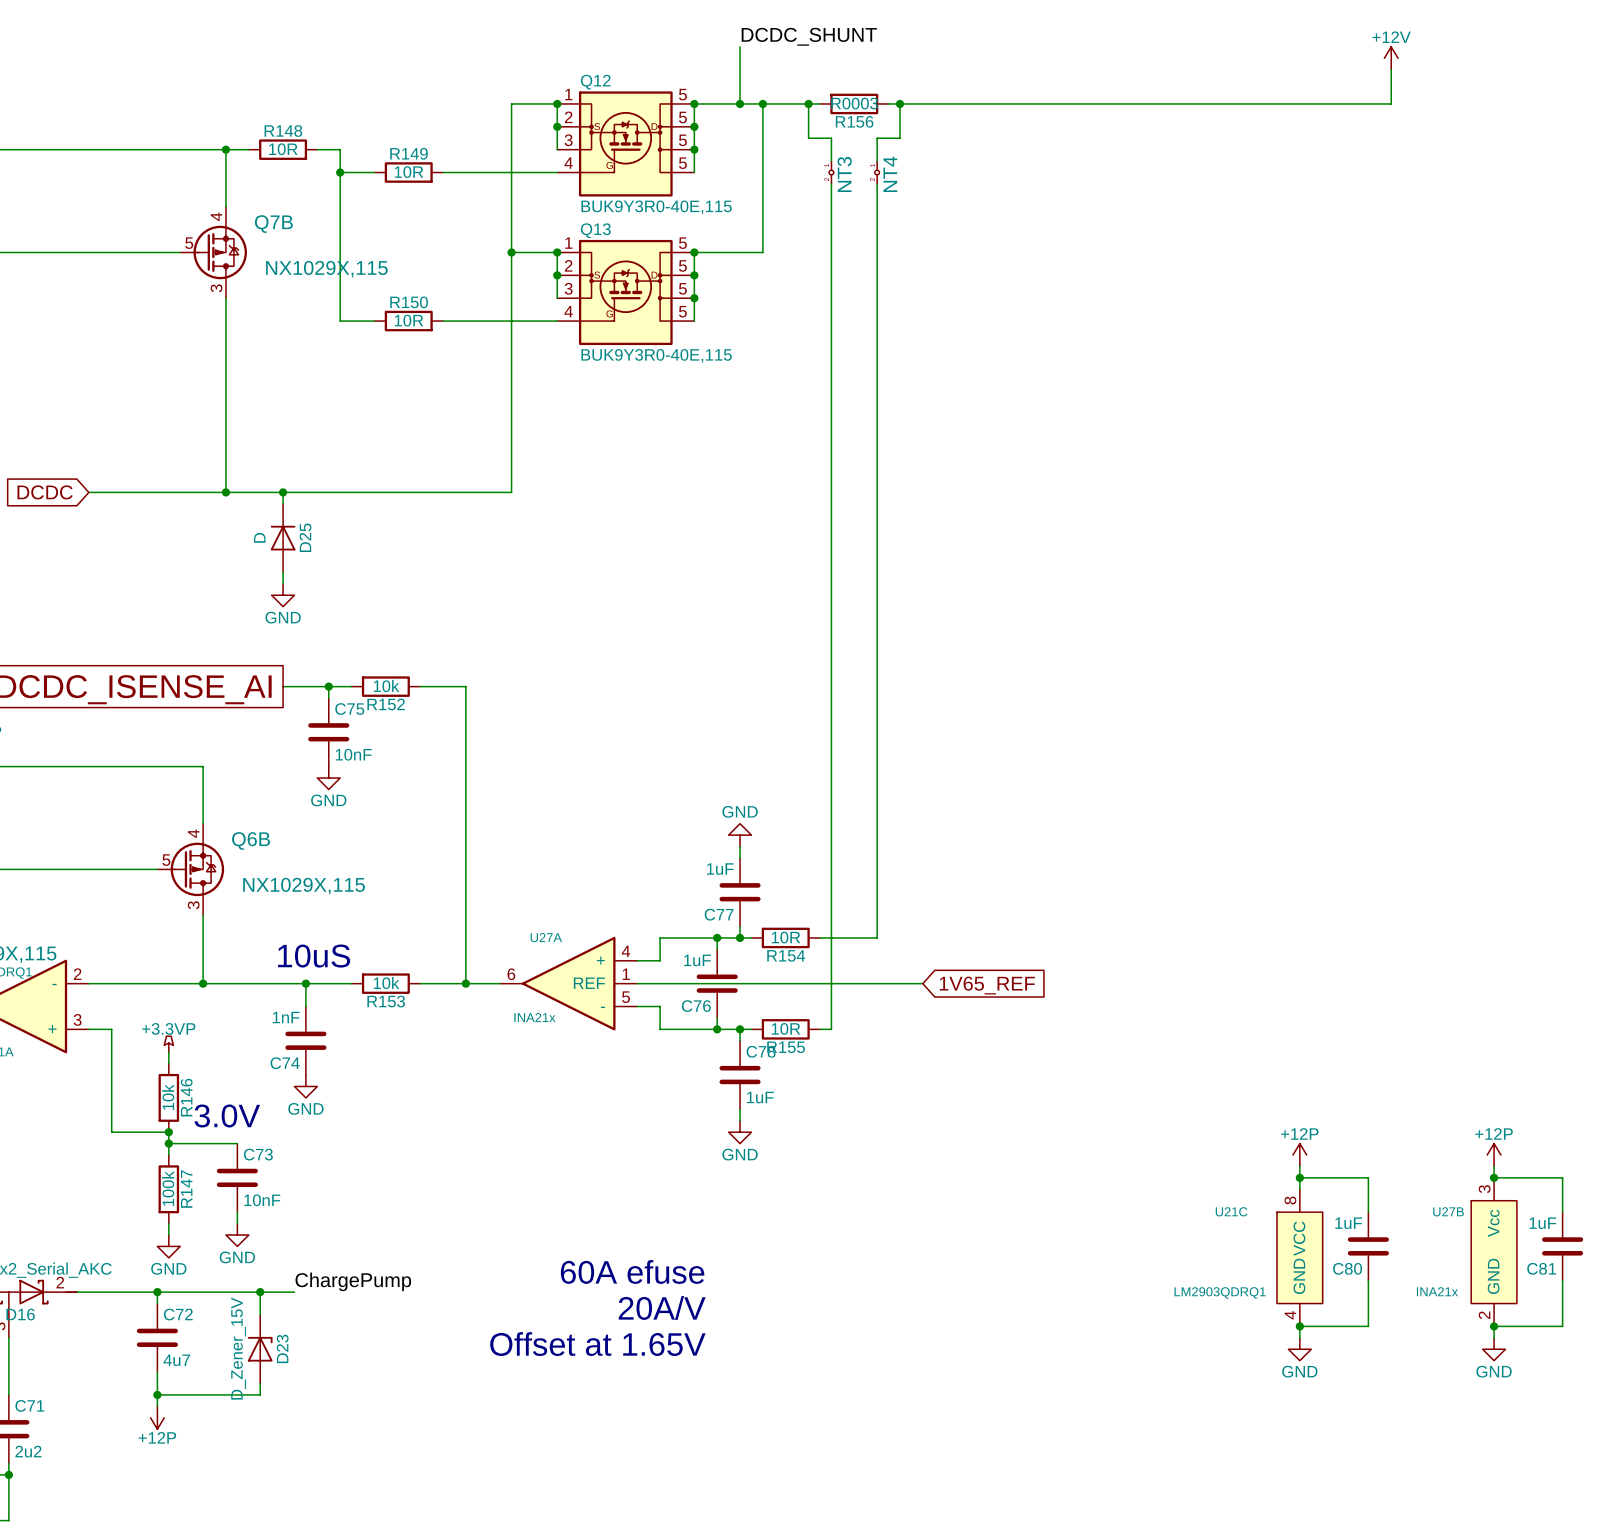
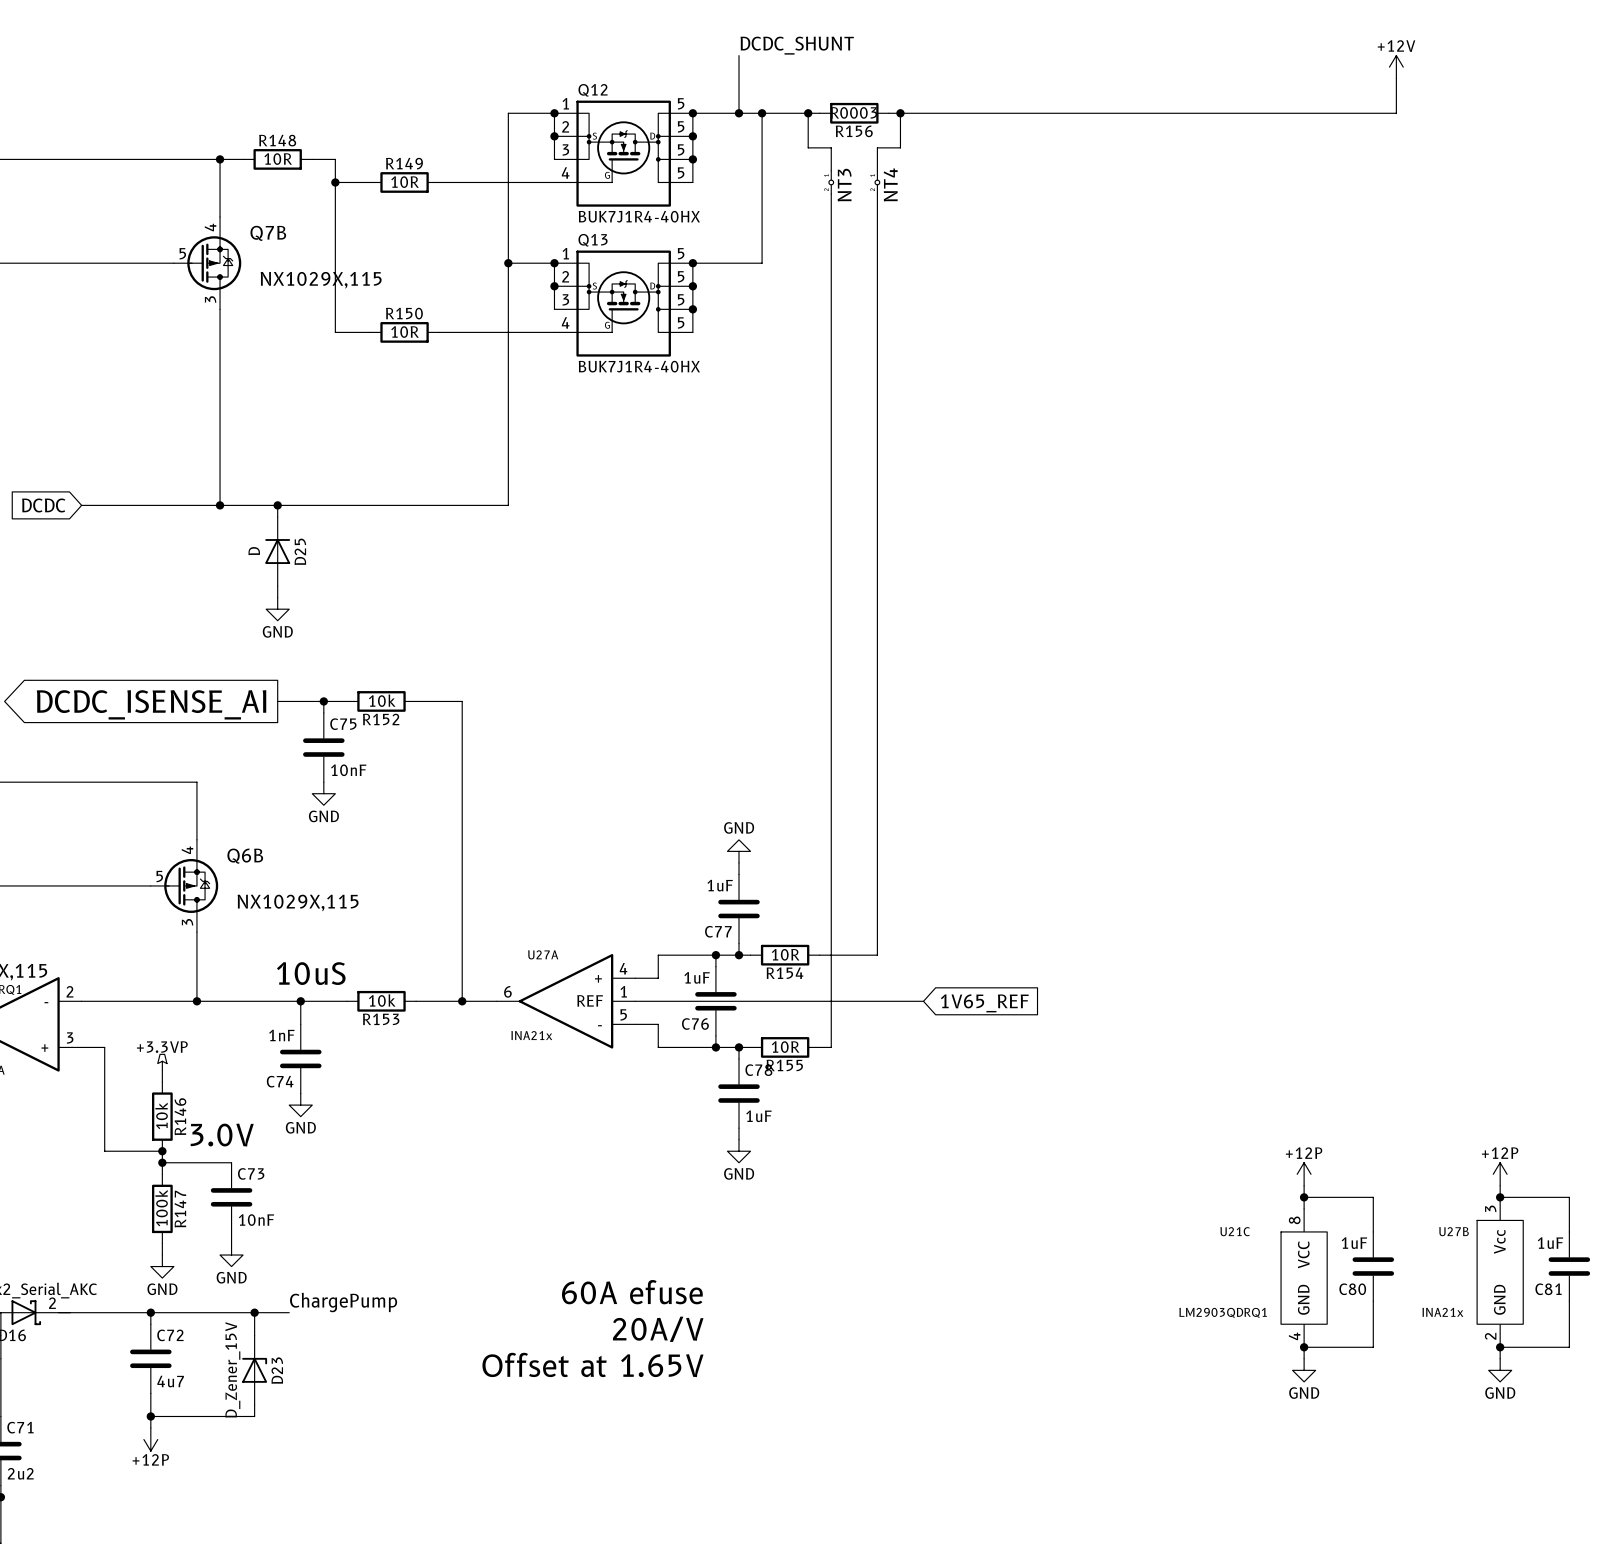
Q12 value: BUK9Y3R0-40E,115 (656, 207) -> BUK7J1R4-40HX (639, 216)
Q13 value: BUK9Y3R0-40E,115 (656, 355) -> BUK7J1R4-40HX (639, 366)

